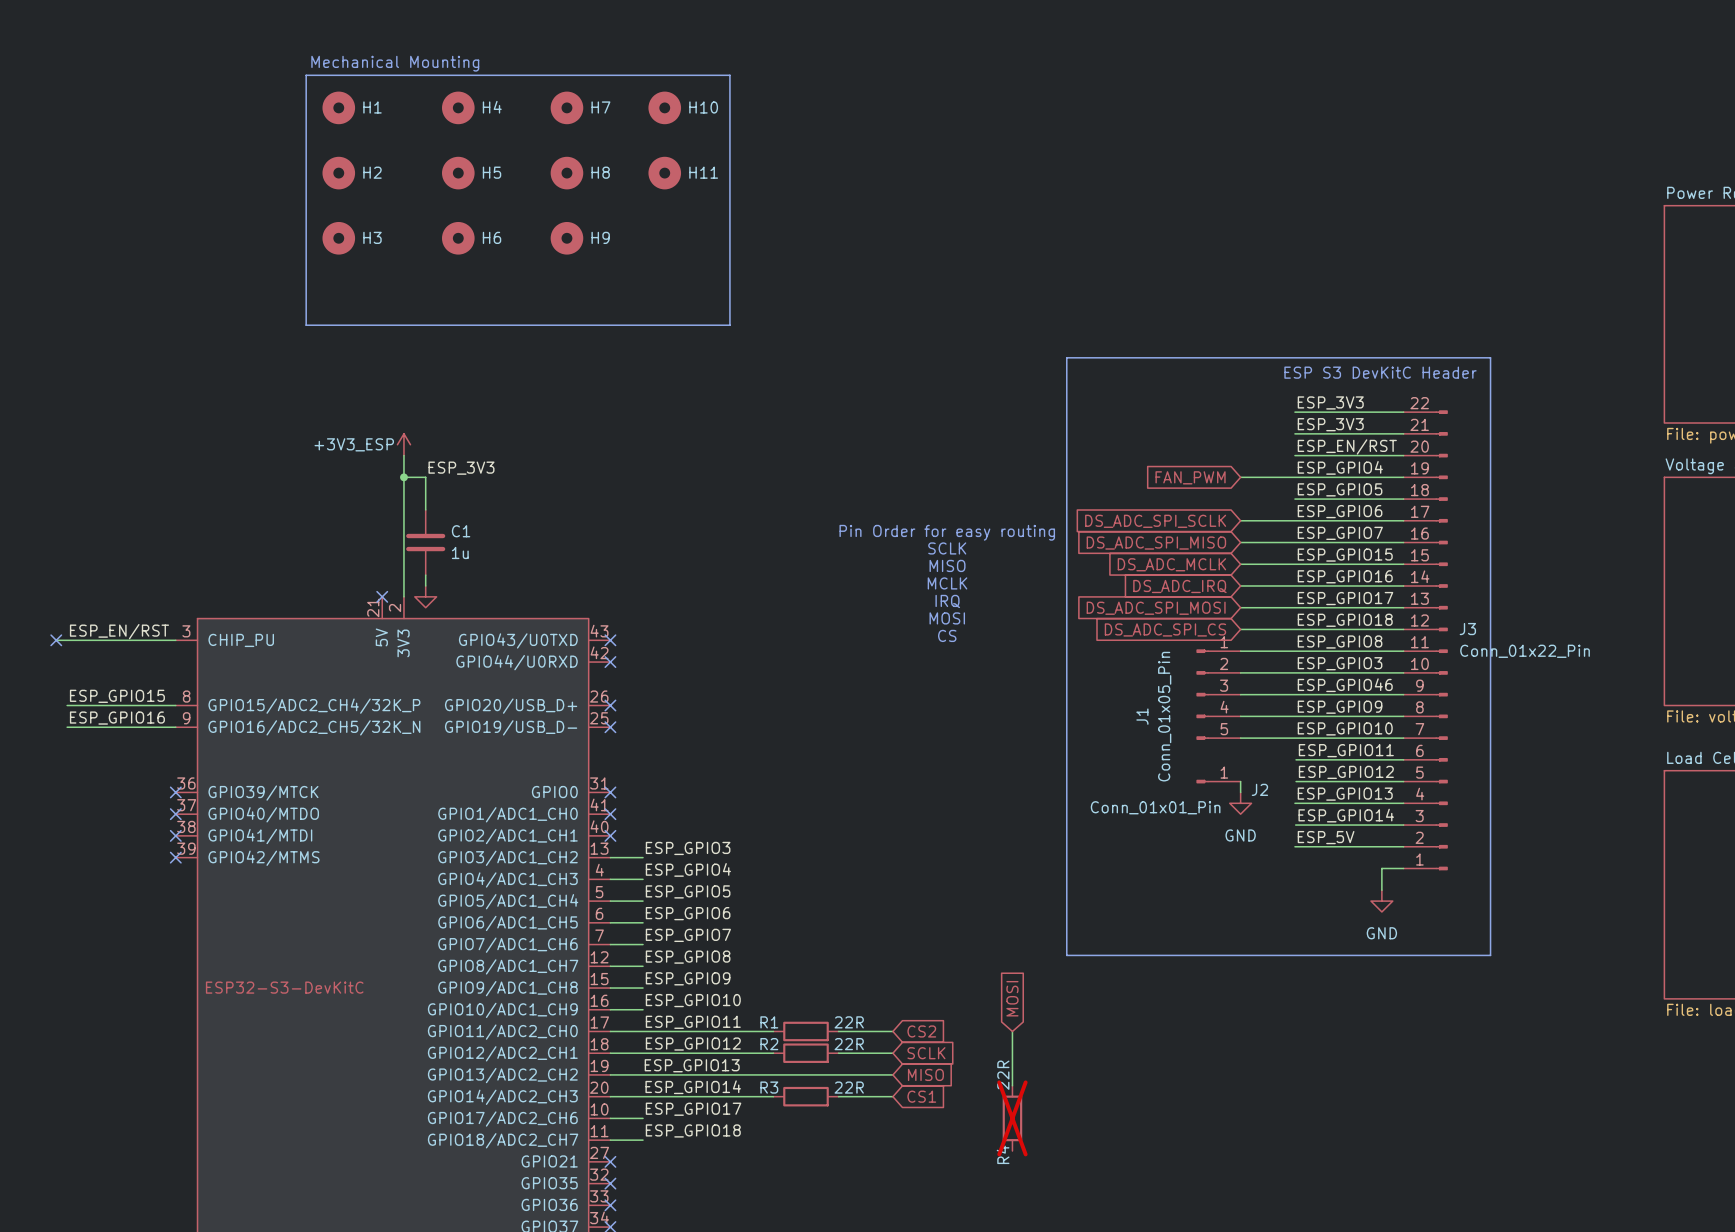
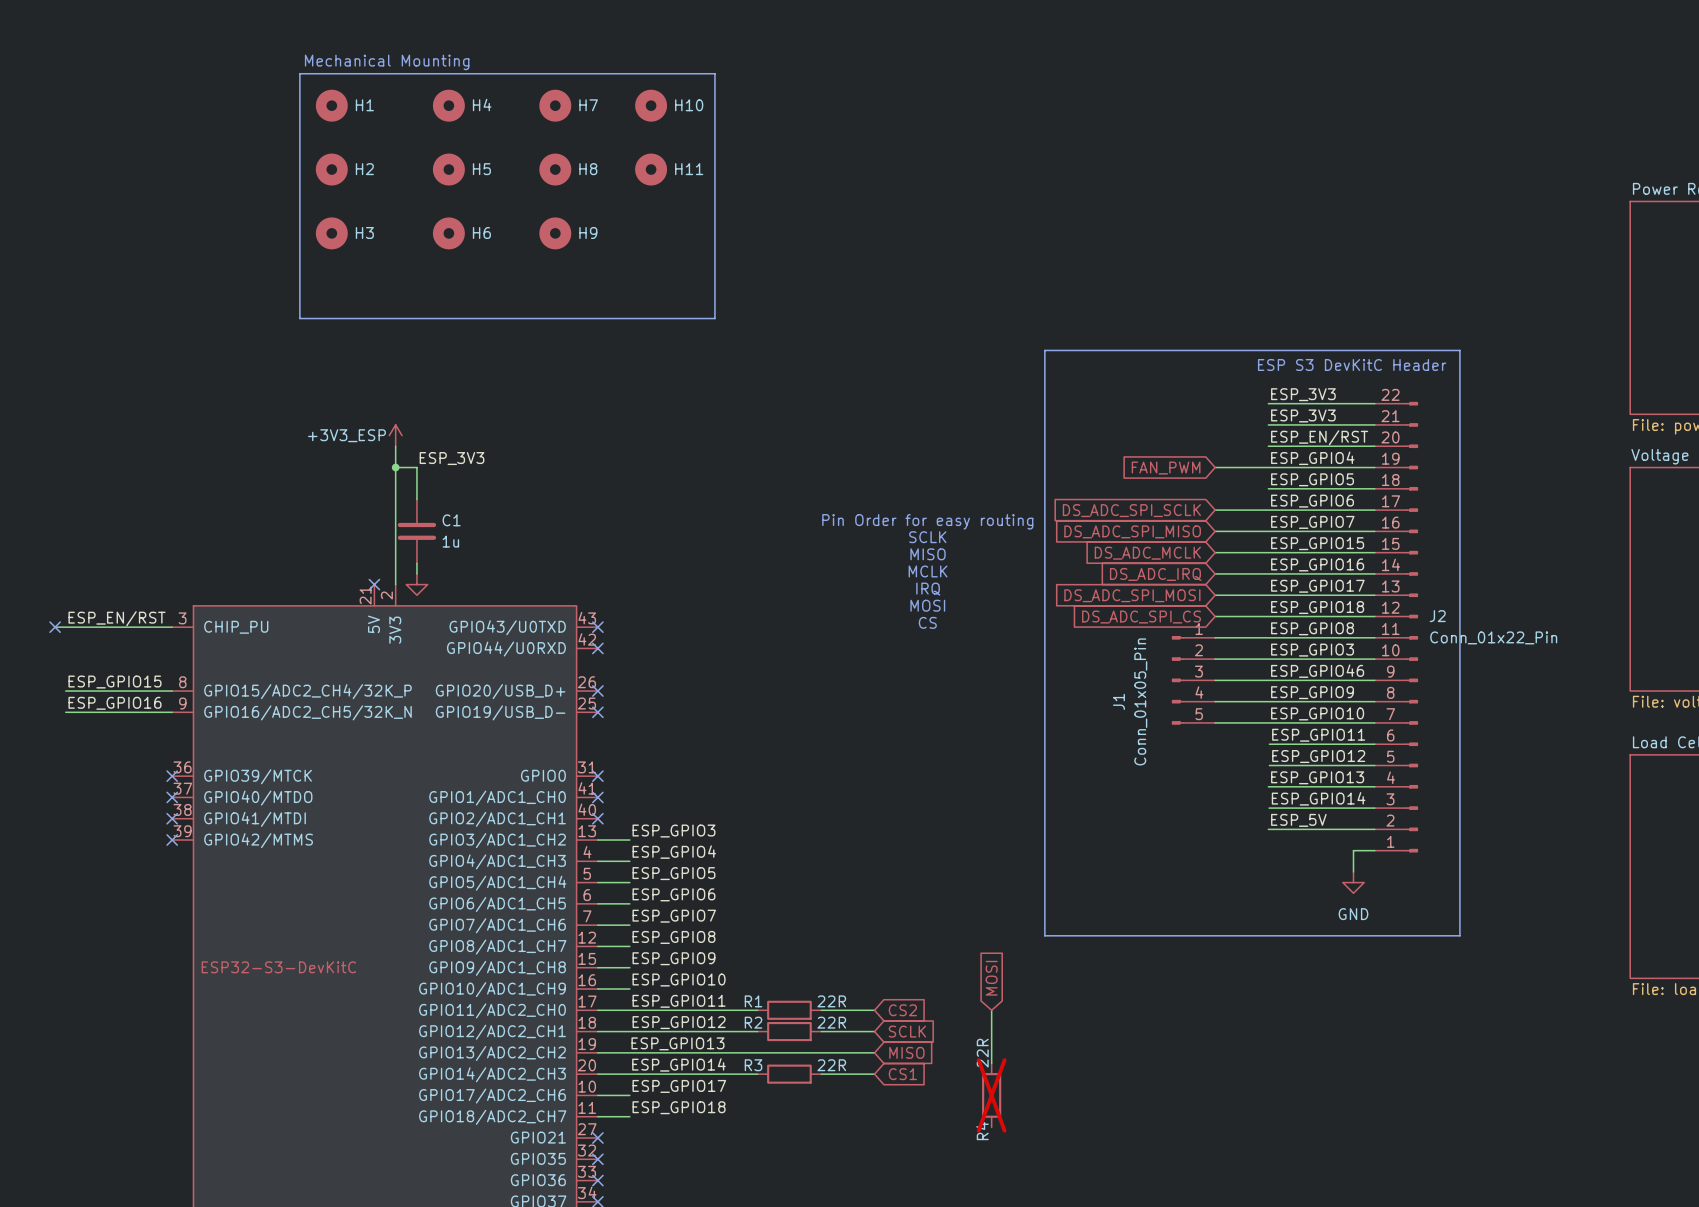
J3 name: J3 (1467, 629) -> J2 (1437, 616)
J2: Conn_01x01_Pin (1218, 781) -> none
wire: (1240, 781) (1240, 792) -> none
power symbol: GND (1240, 803) -> none

